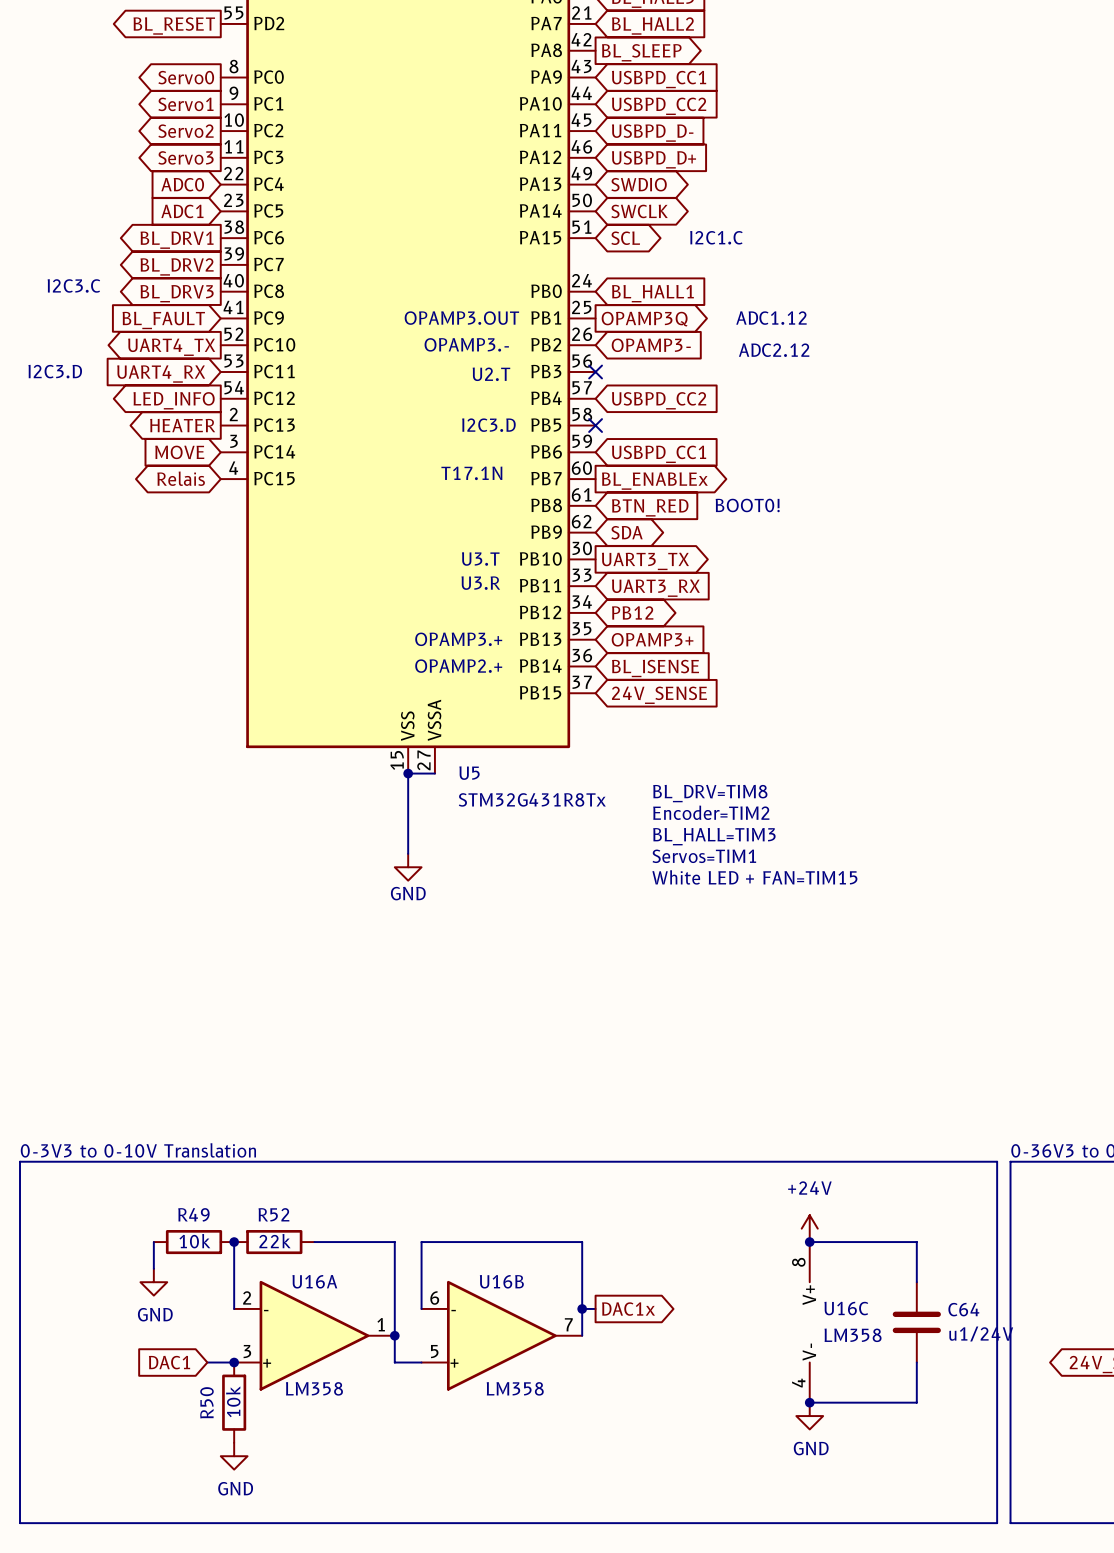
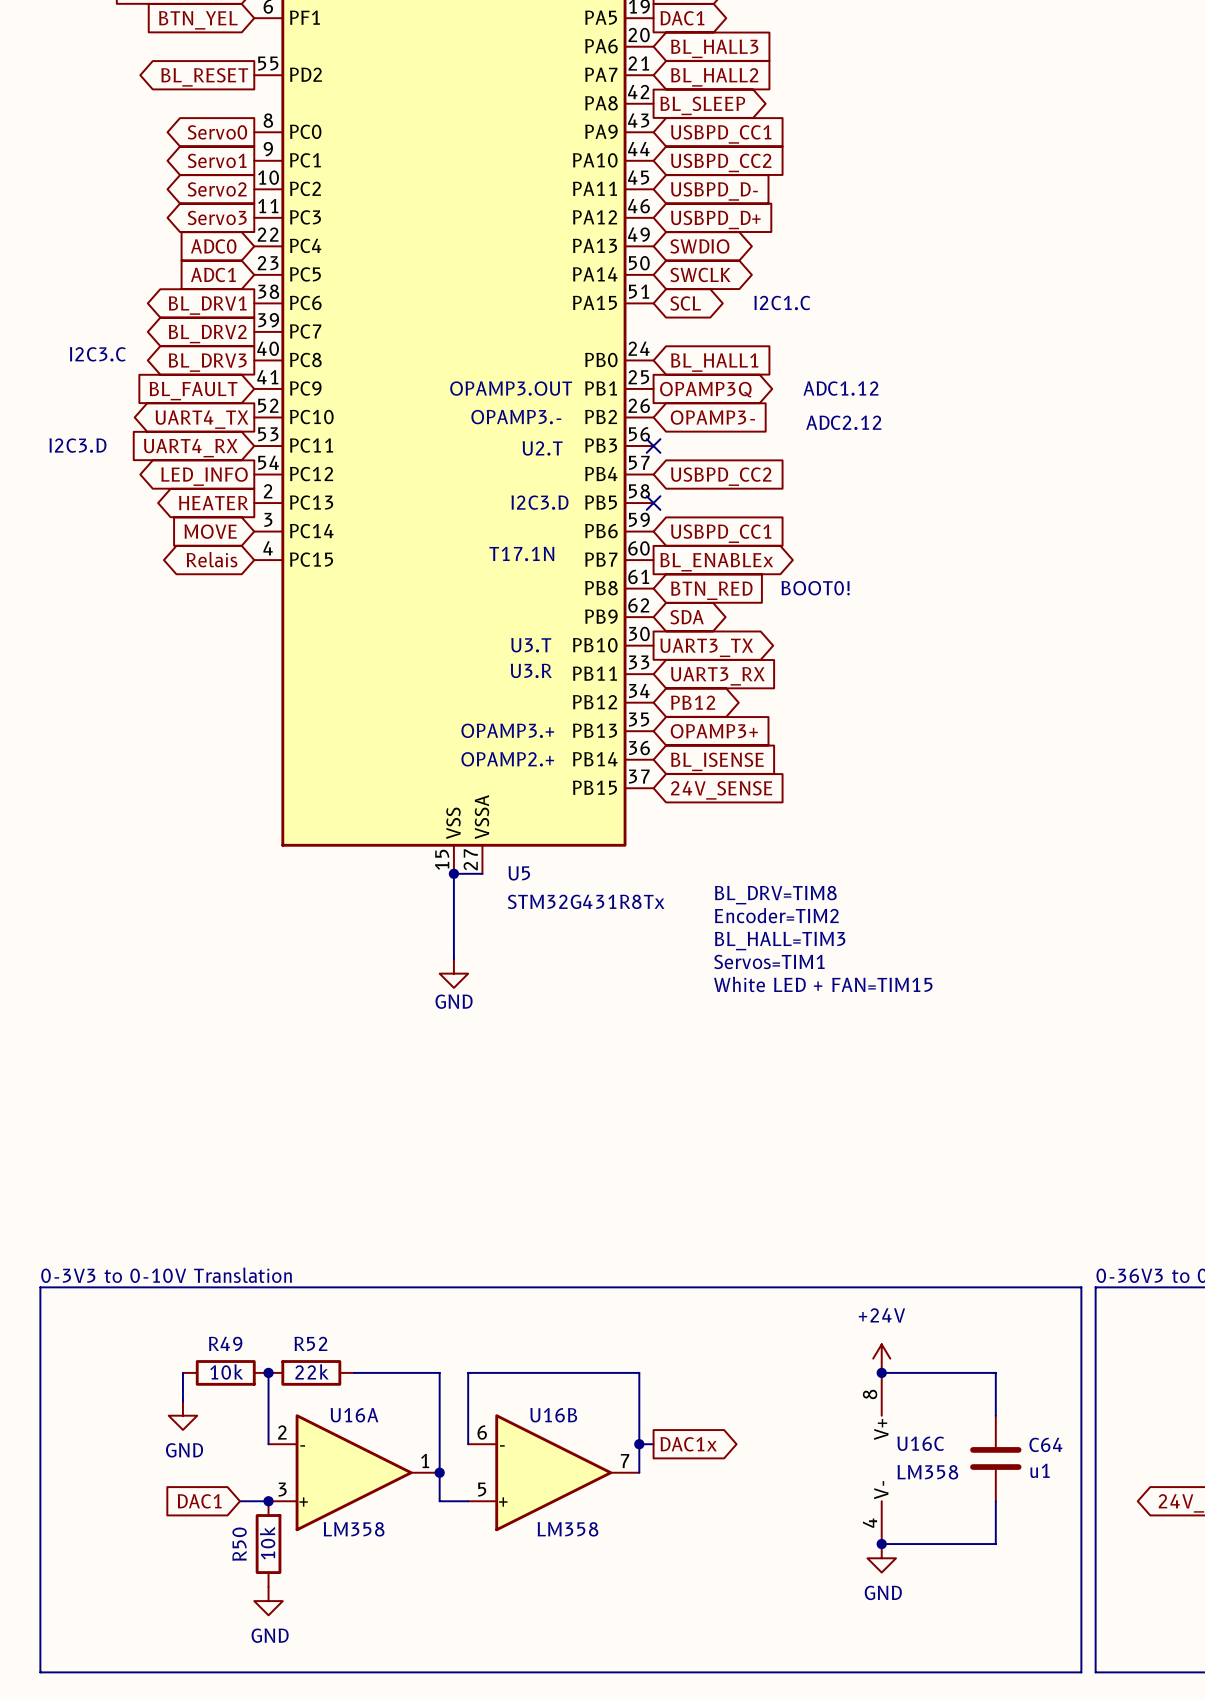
C64 value: u1/24V (981, 1333) -> u1 (1040, 1470)

